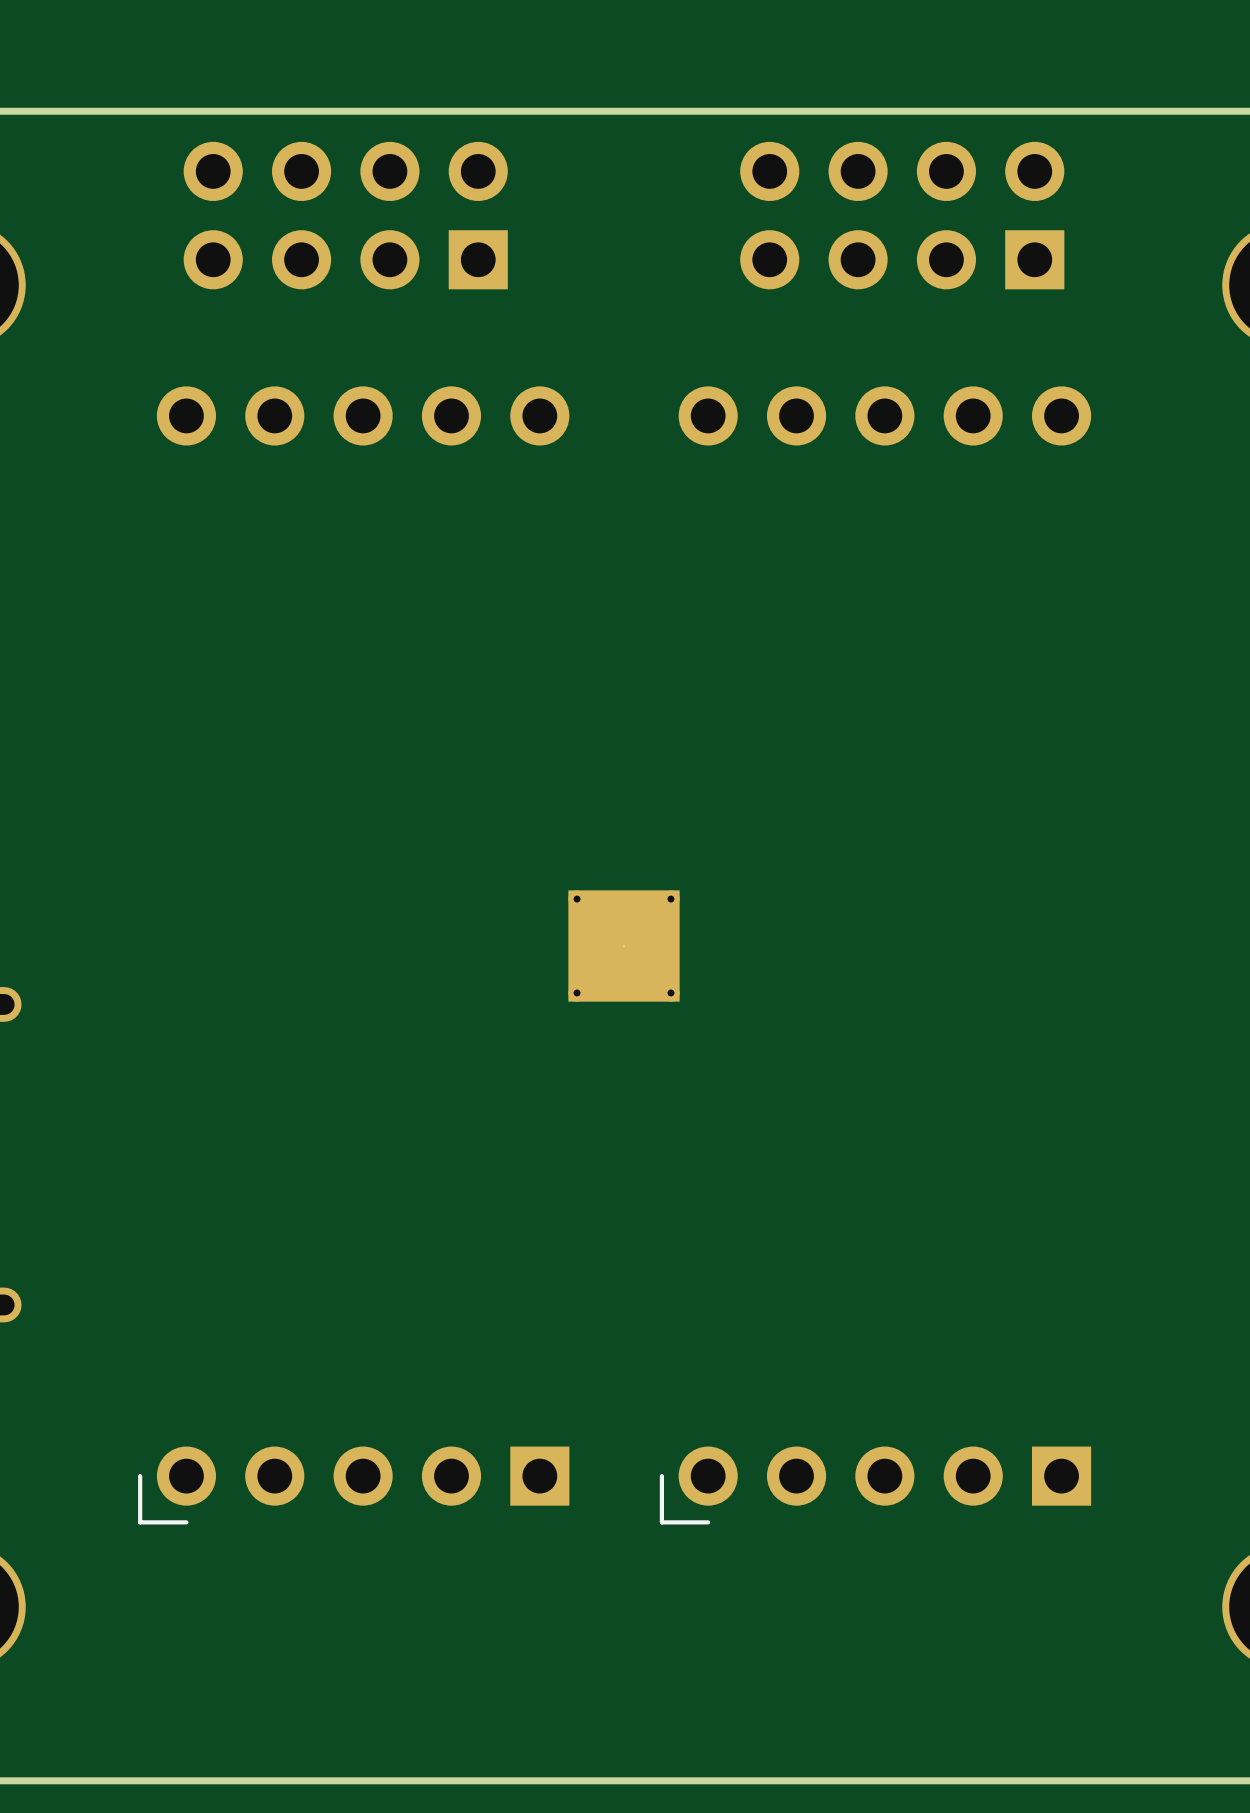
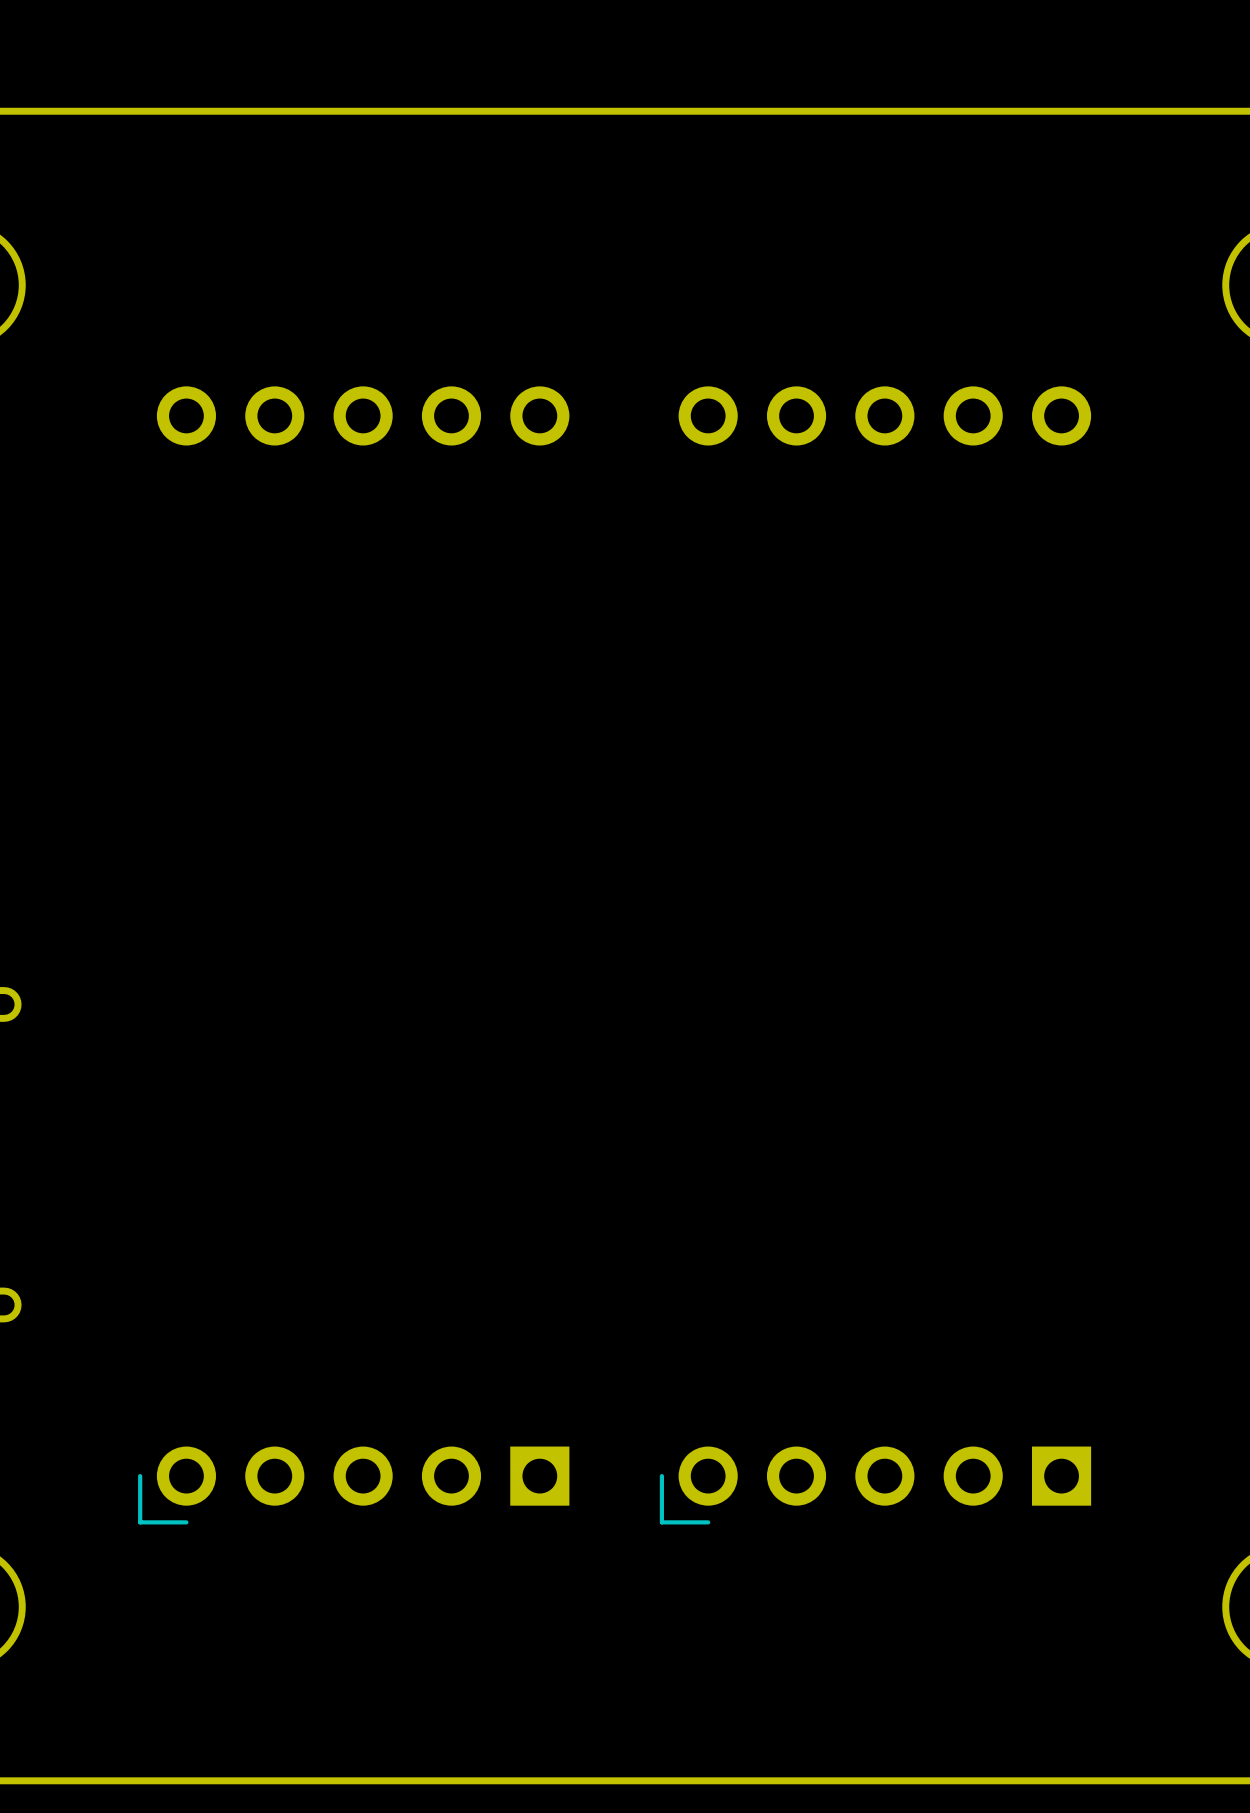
part: (345, 215) -> none
part: (902, 215) -> none
round board edge: [623, 945, 625, 947] -> none
part: (624, 946) -> none

